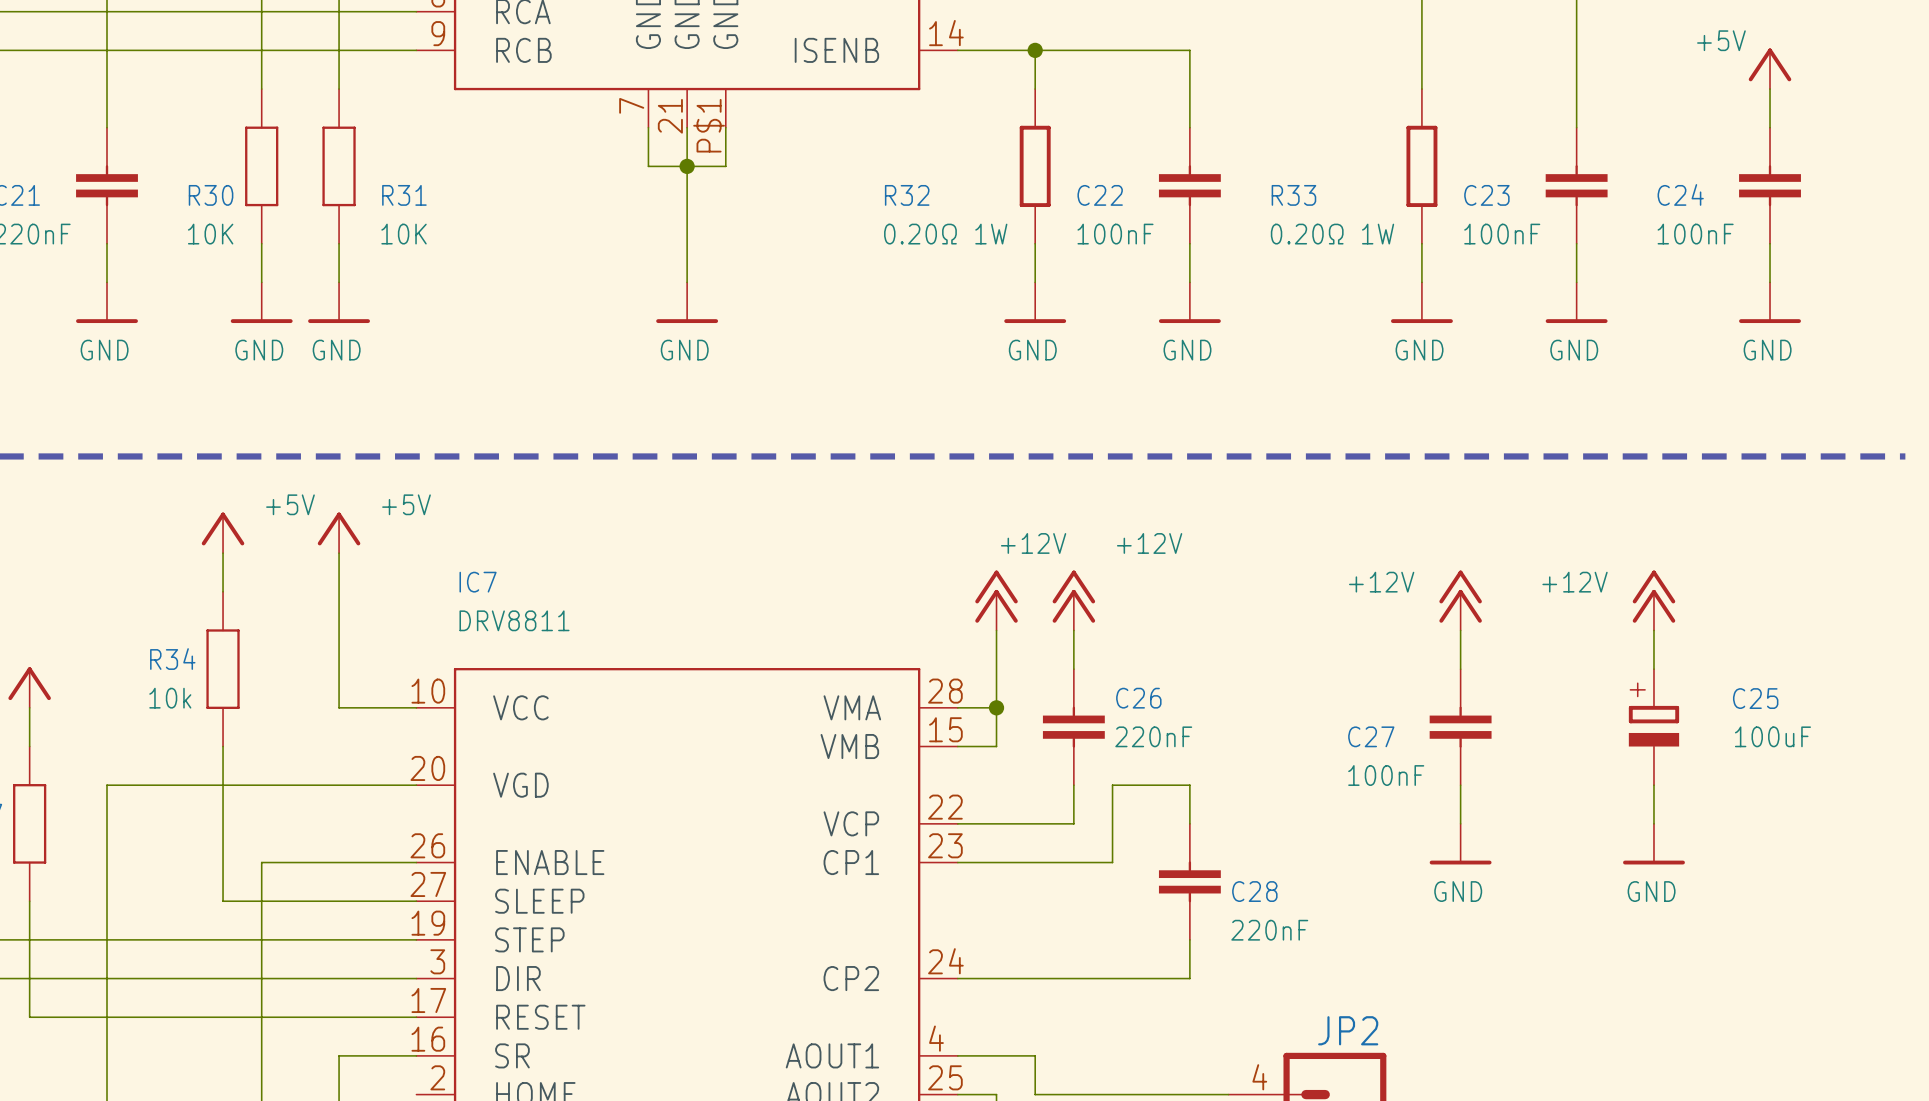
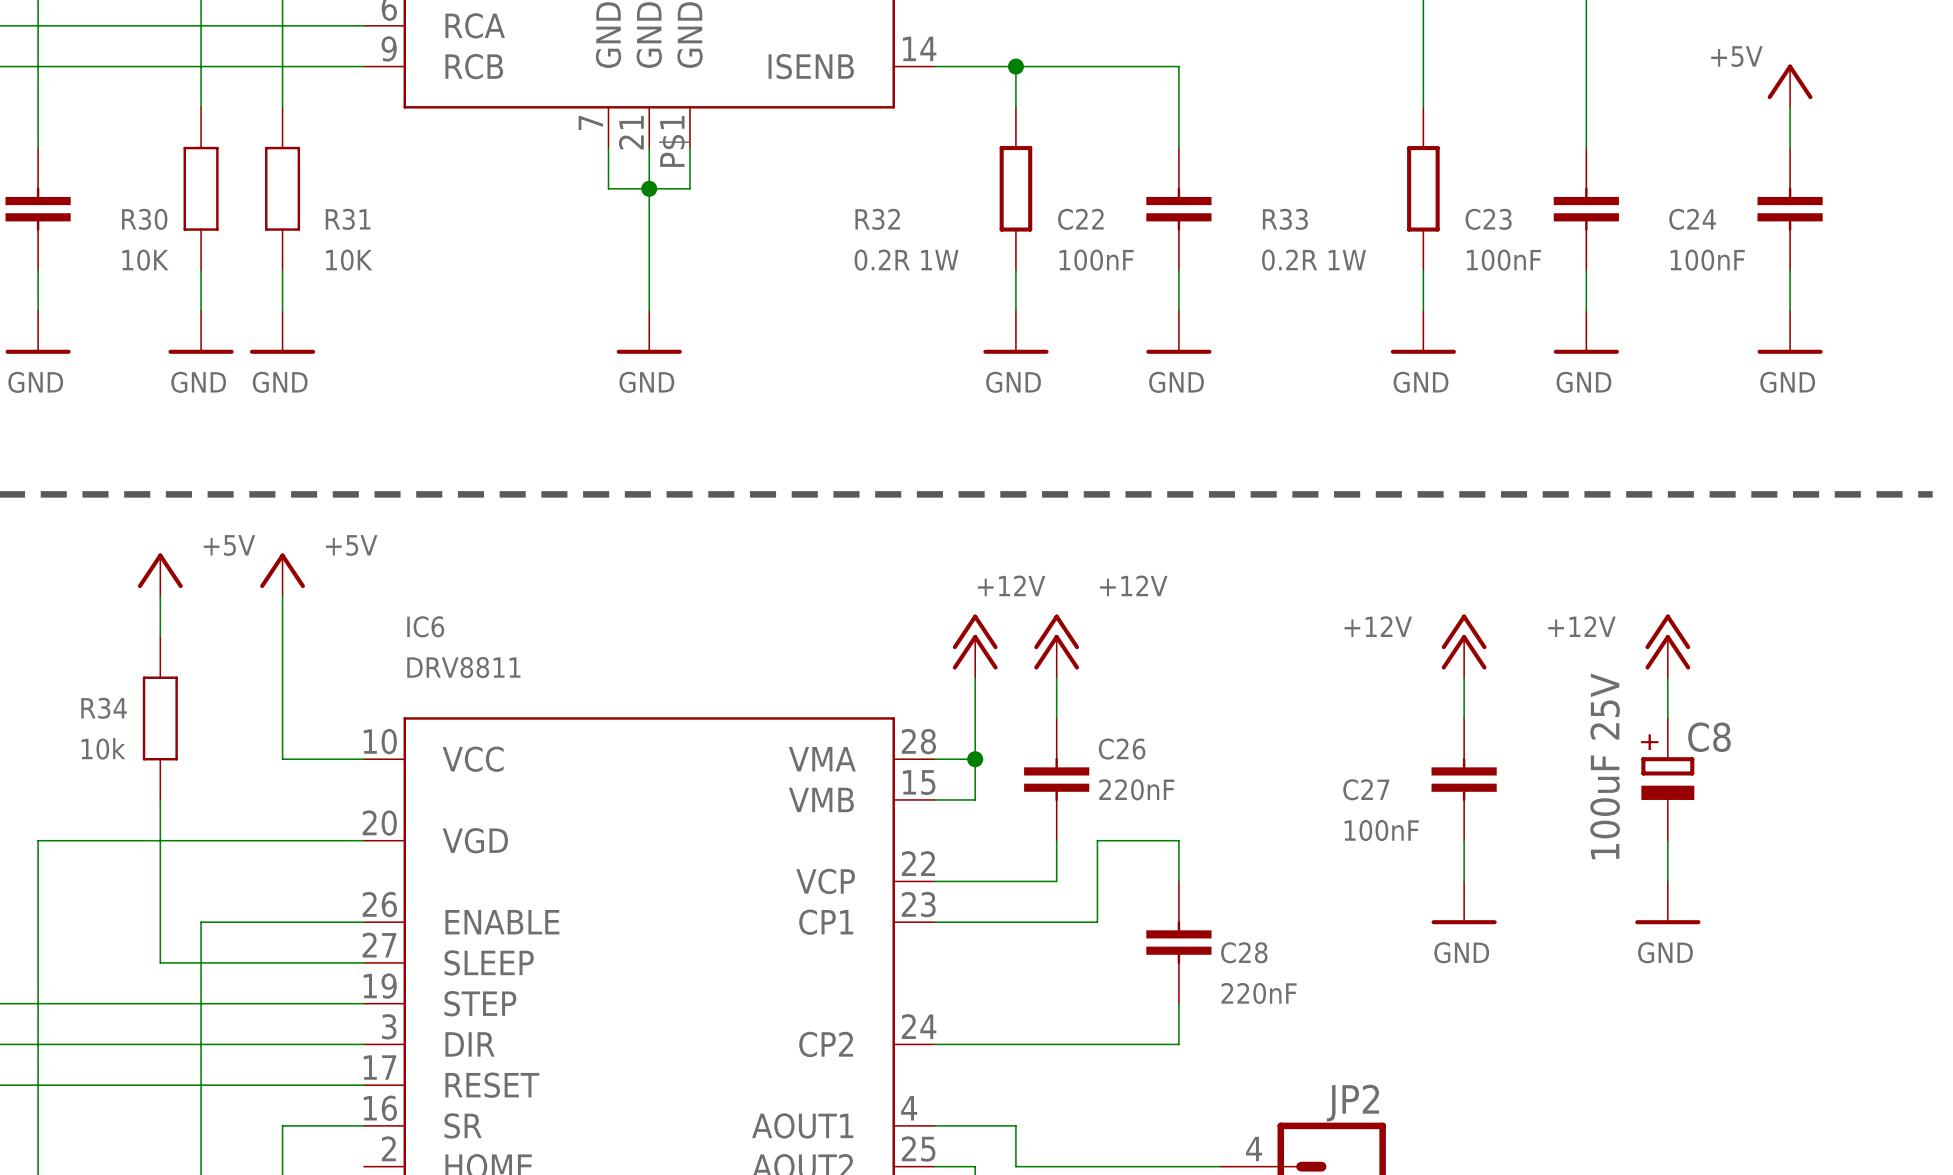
R32 value: 0.20Ω 1W (945, 234) -> 0.2R 1W (906, 260)
R33 value: 0.20Ω 1W (1332, 234) -> 0.2R 1W (1313, 260)
IC7 name: IC7 (478, 582) -> IC6 (425, 626)
C25 name: C25 (1755, 698) -> C8 (1709, 737)
C25 value: 100uF (1772, 736) -> 100uF 25V (1605, 766)

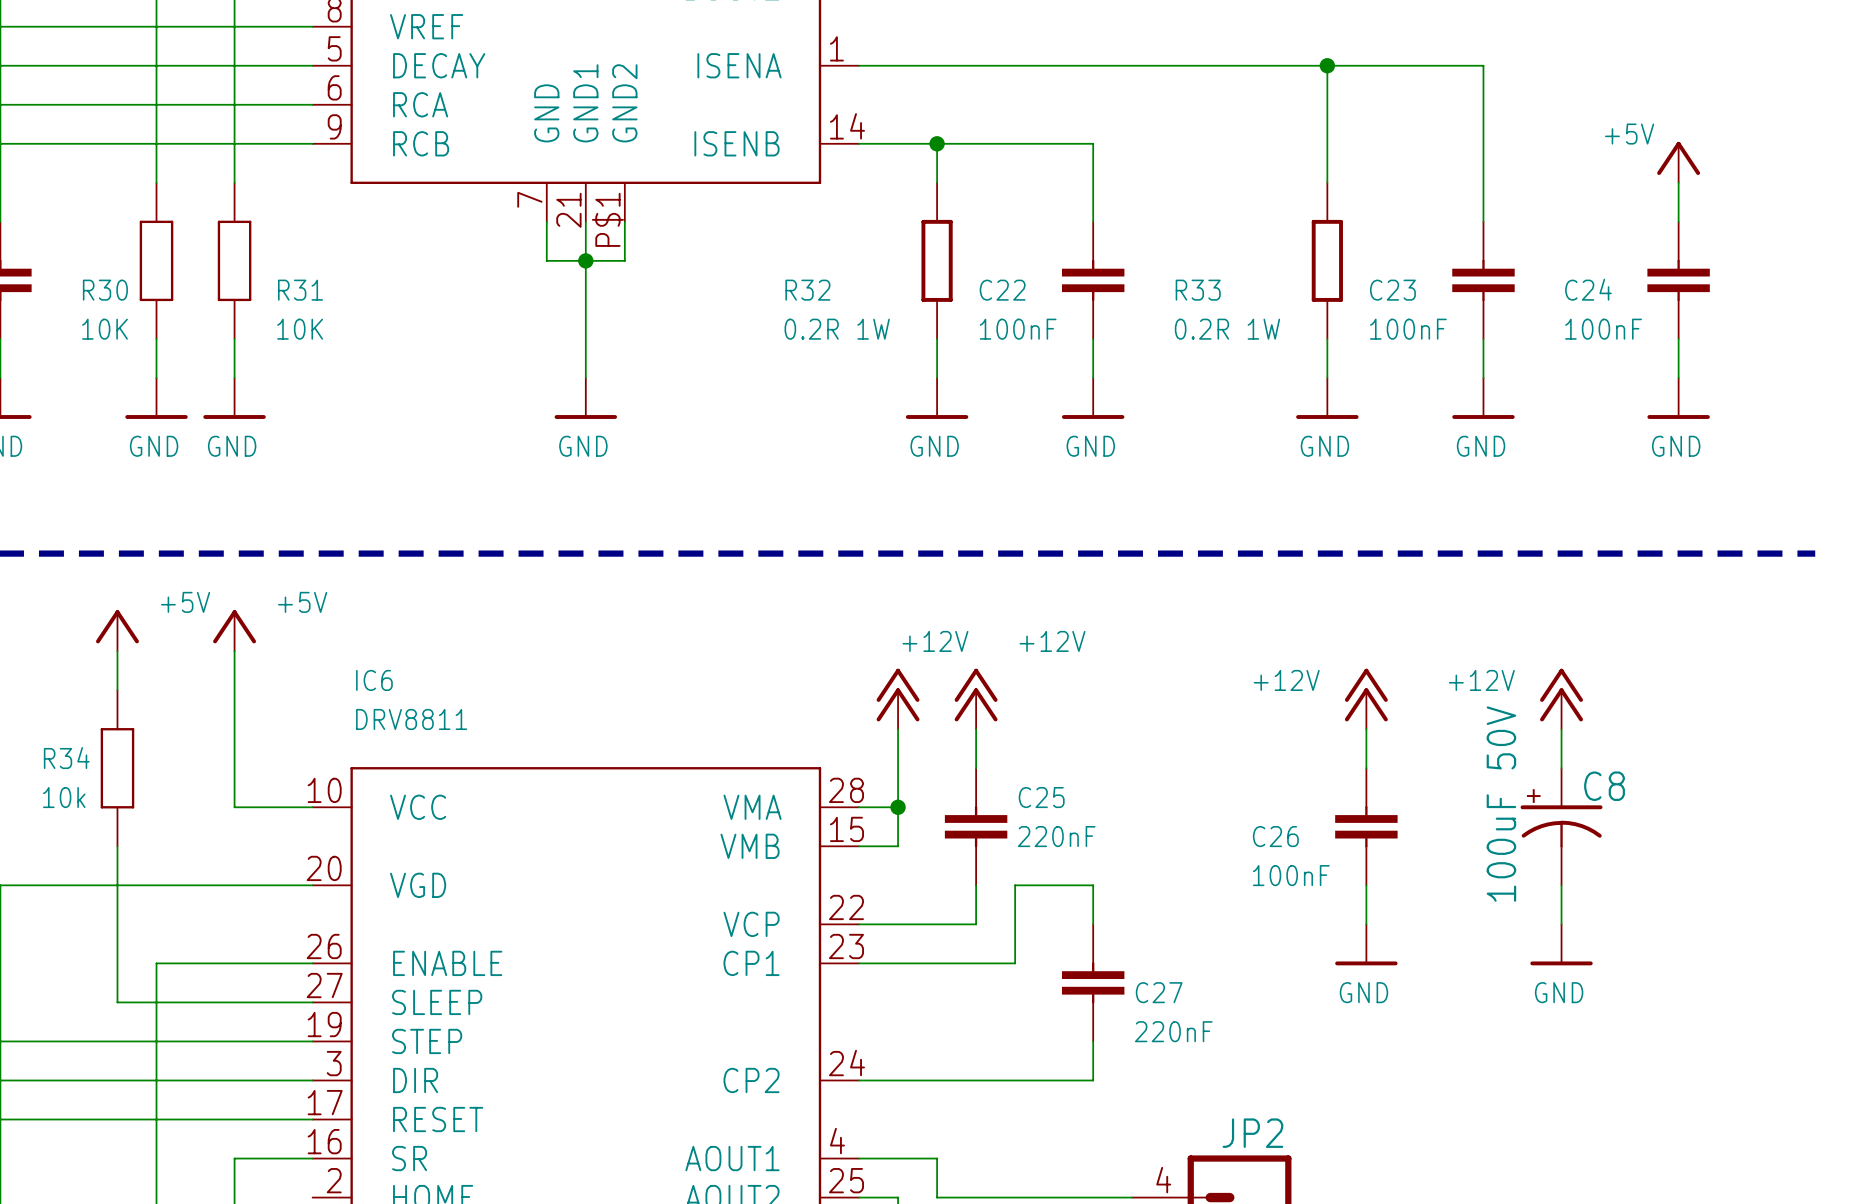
C8 symbol: [1641, 718, 1695, 841] -> [1520, 768, 1603, 886]
C26 name: C26 (1122, 749) -> C25 (1041, 797)
C8 value: 100uF 25V (1605, 766) -> 100uF 50V (1501, 804)
C27 name: C27 (1366, 789) -> C26 (1275, 836)
C28 name: C28 (1244, 952) -> C27 (1159, 992)

